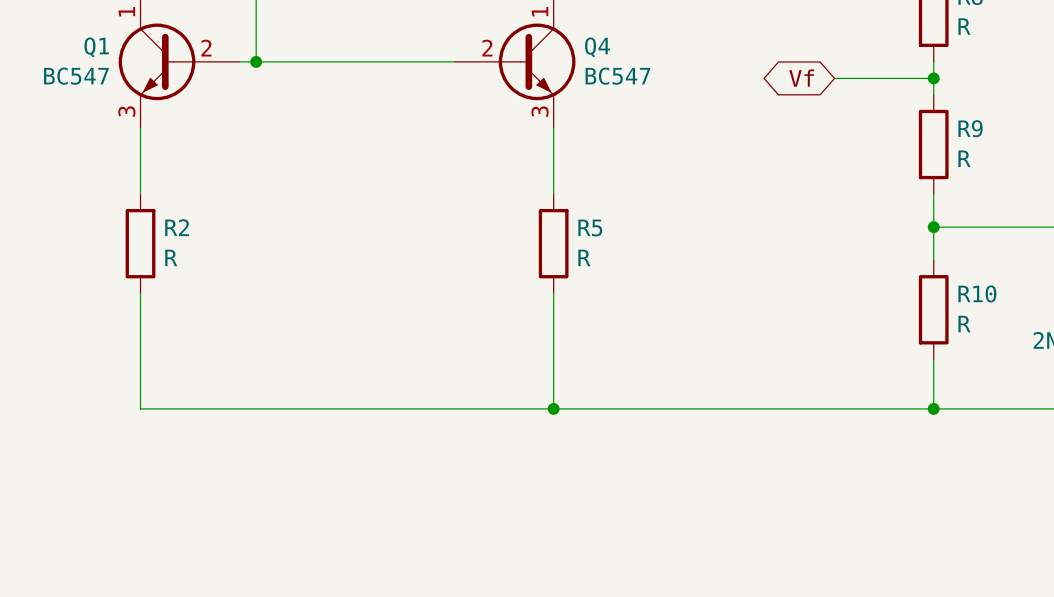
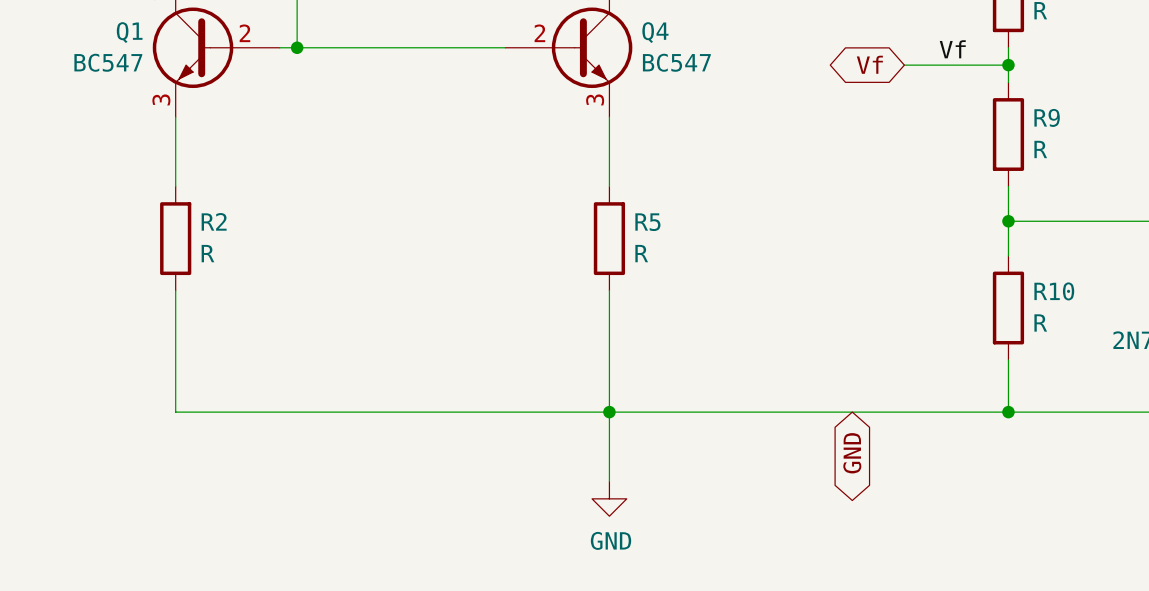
label: none -> Vf (952, 49)
wire: none -> (609, 412) (609, 481)
global label: none -> GND (852, 453)
power symbol: none -> GND (609, 498)

